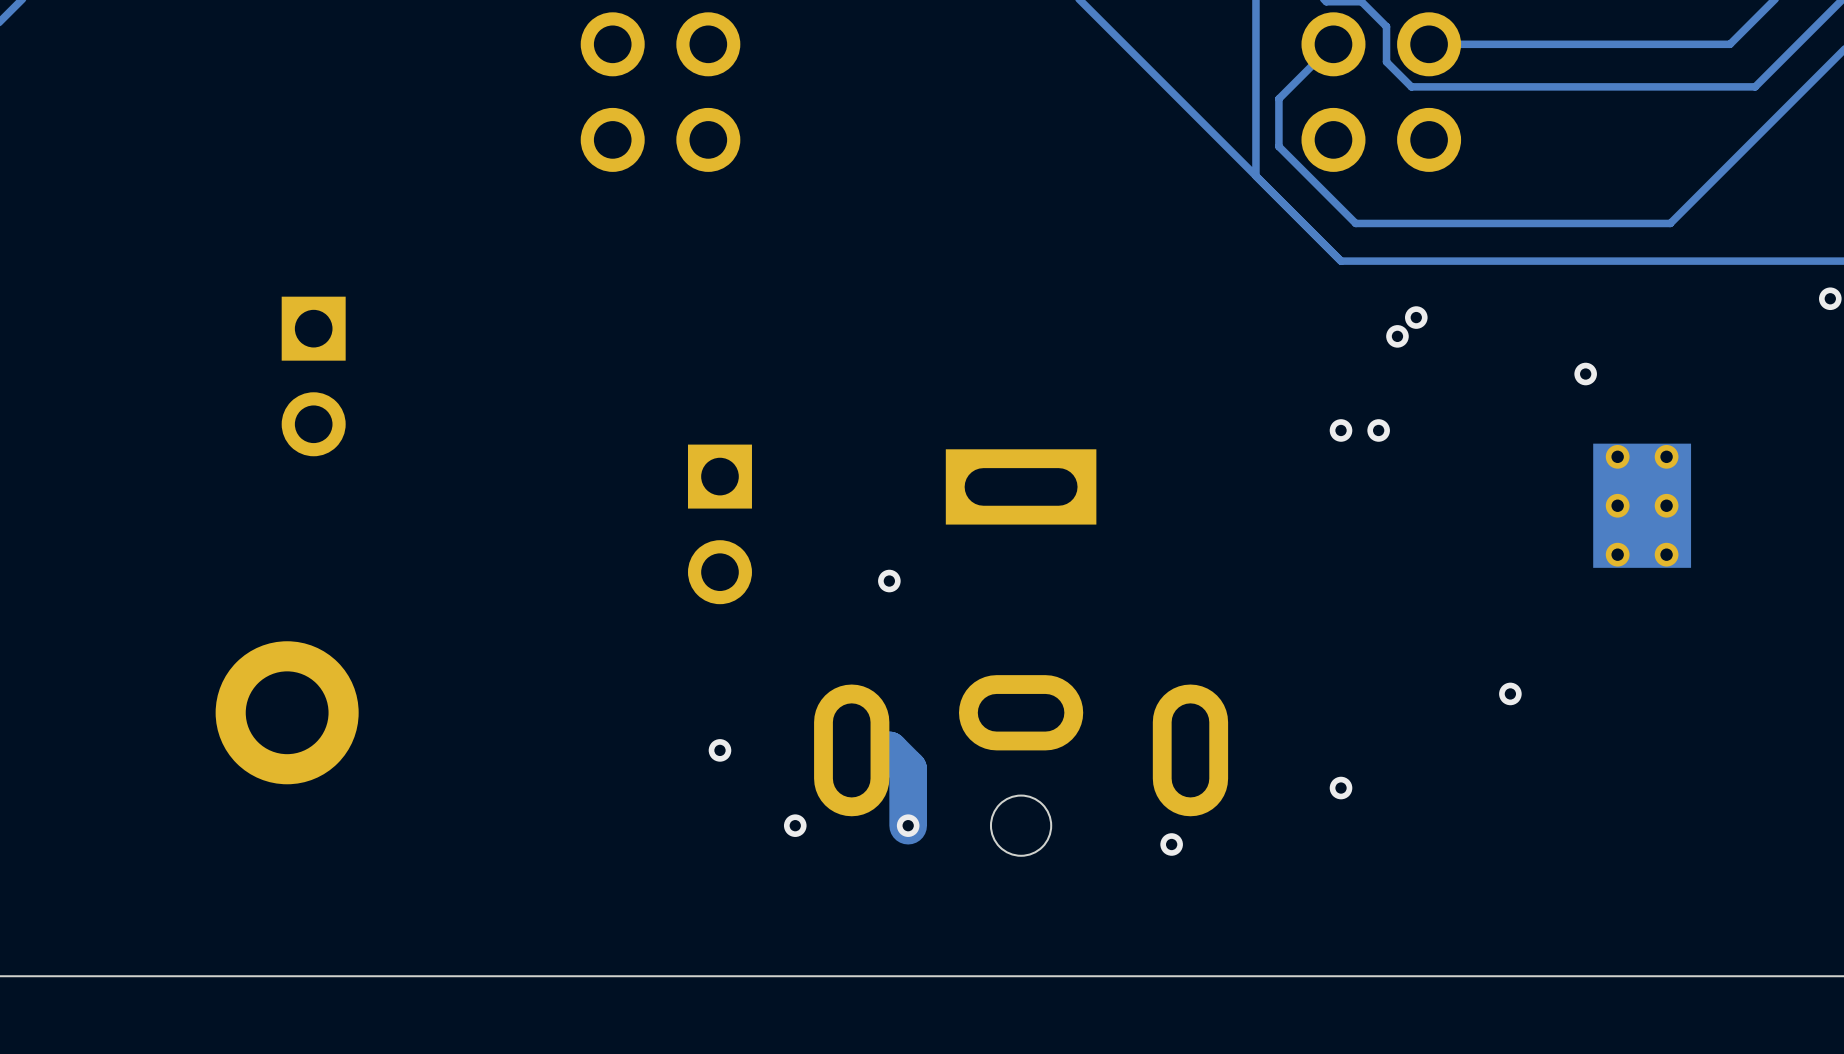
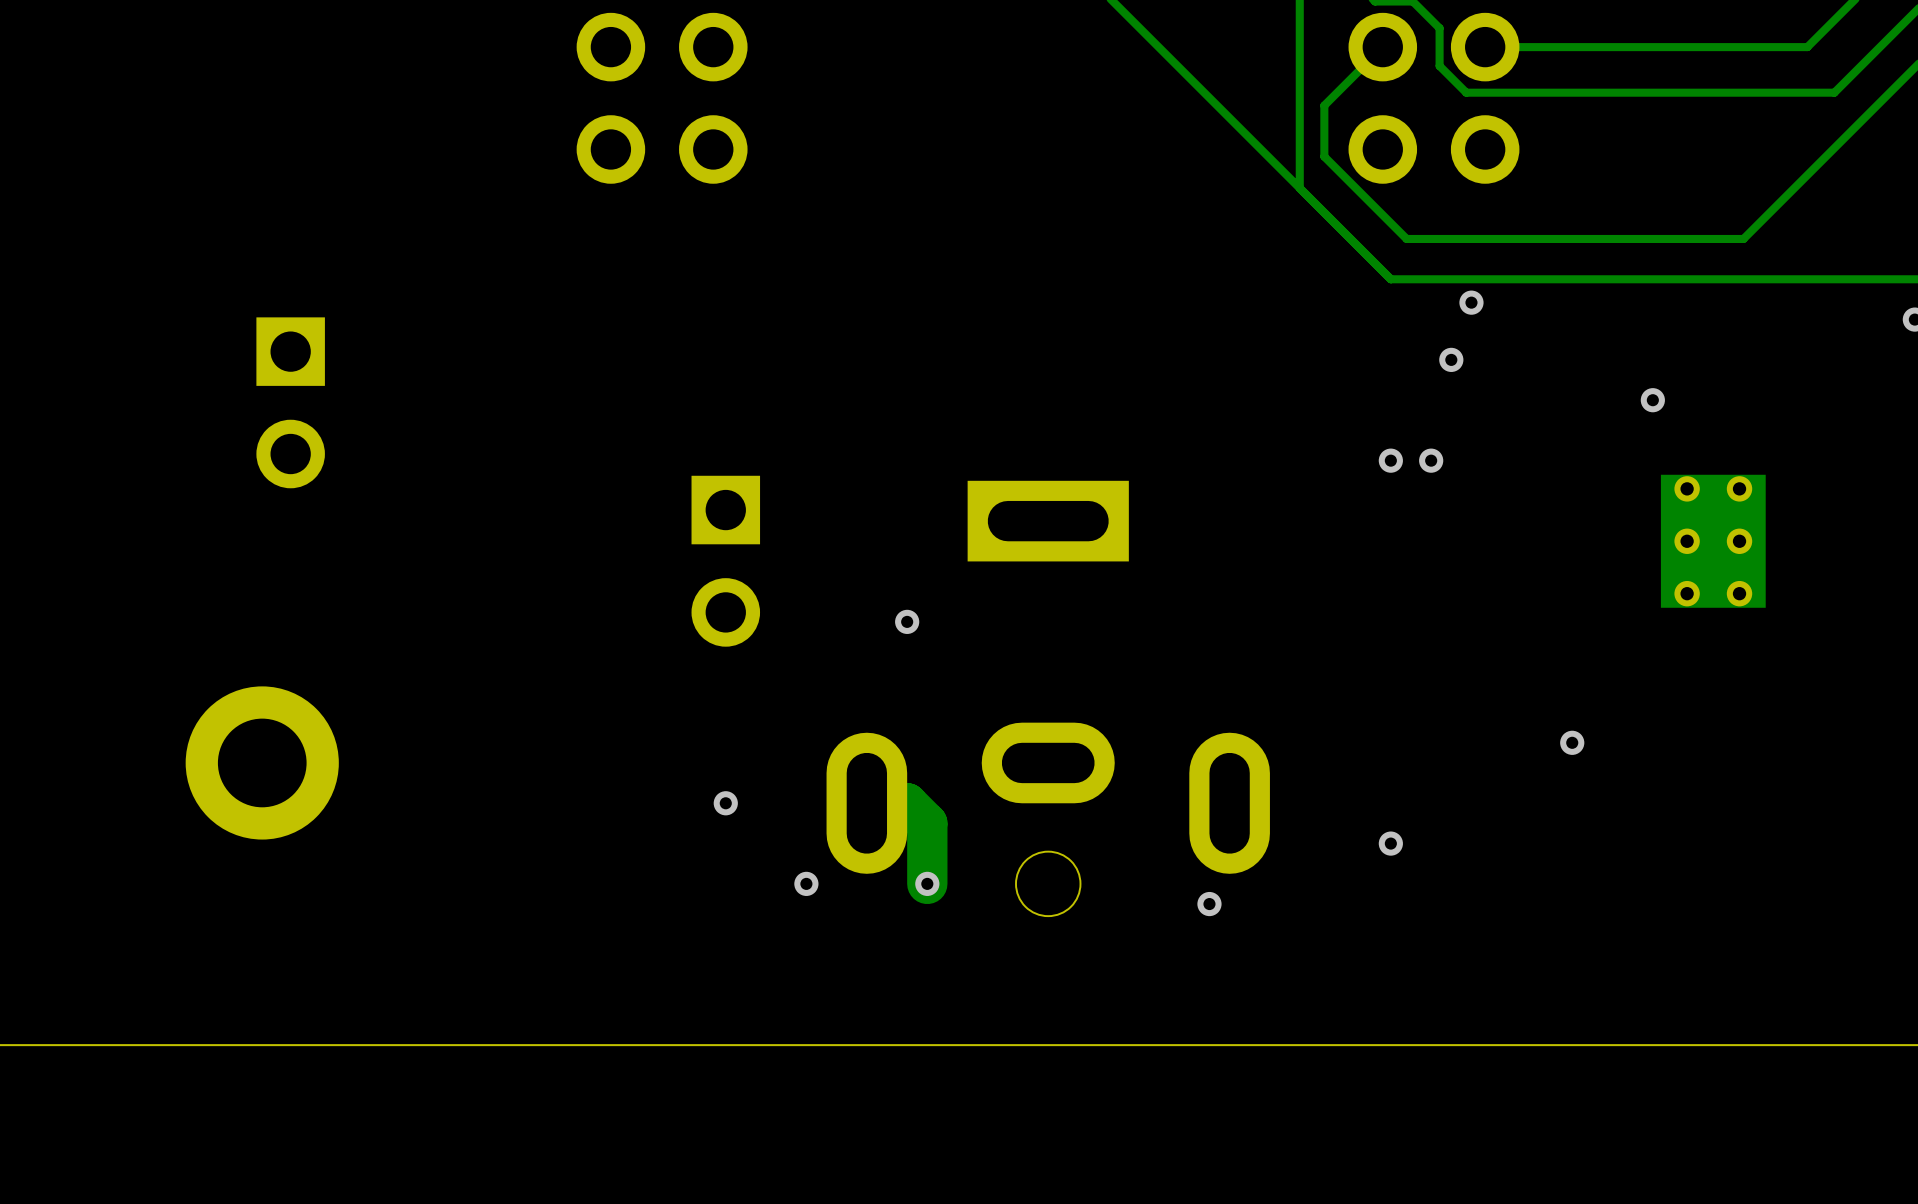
via position: (1416, 317) -> (1471, 302)

